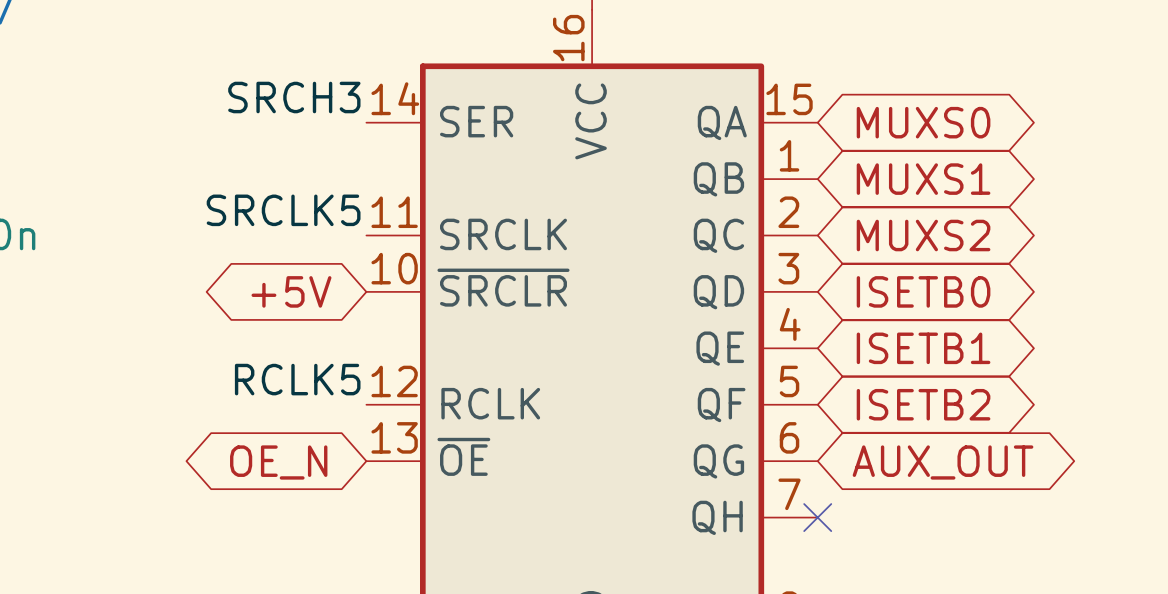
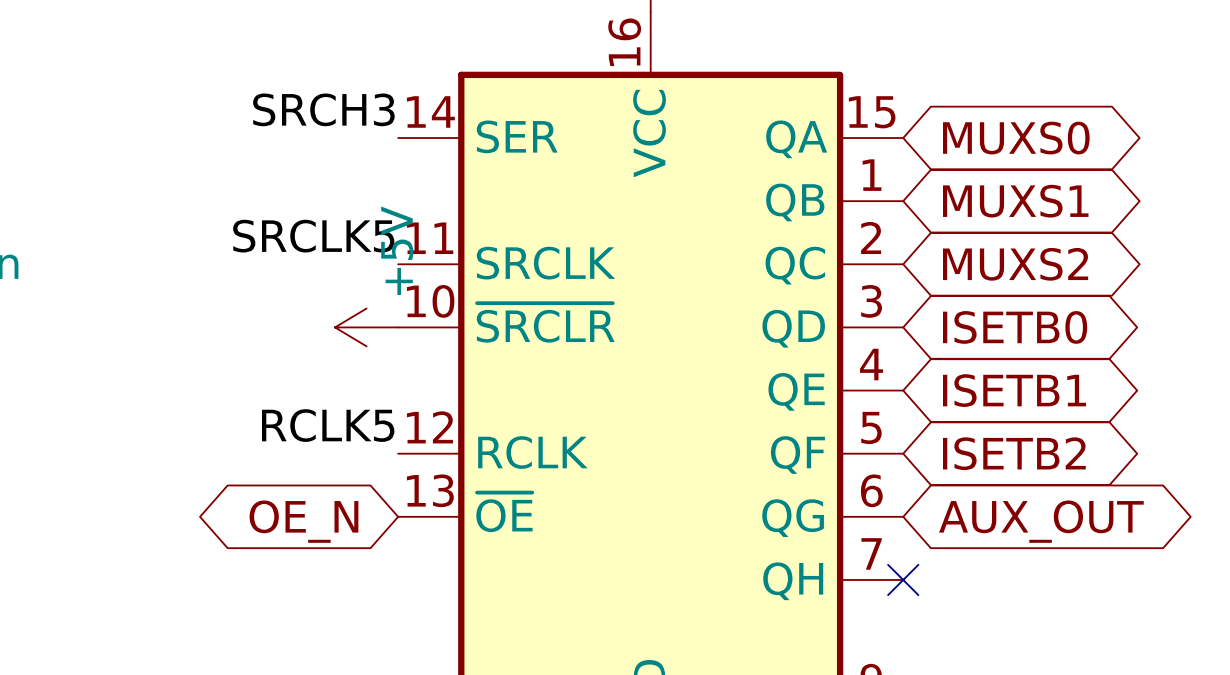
global label: +5V (291, 291) -> none
power symbol: none -> +5V (366, 327)

